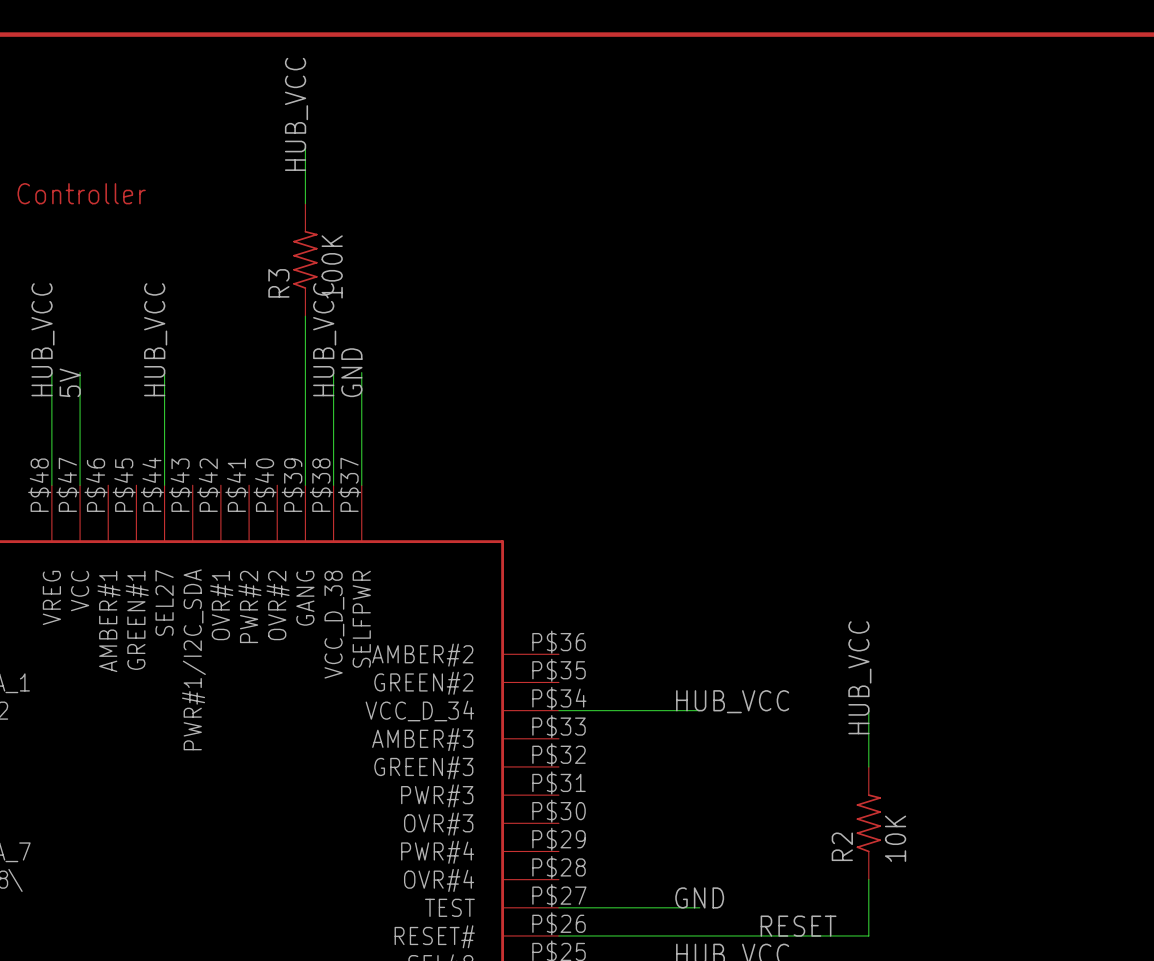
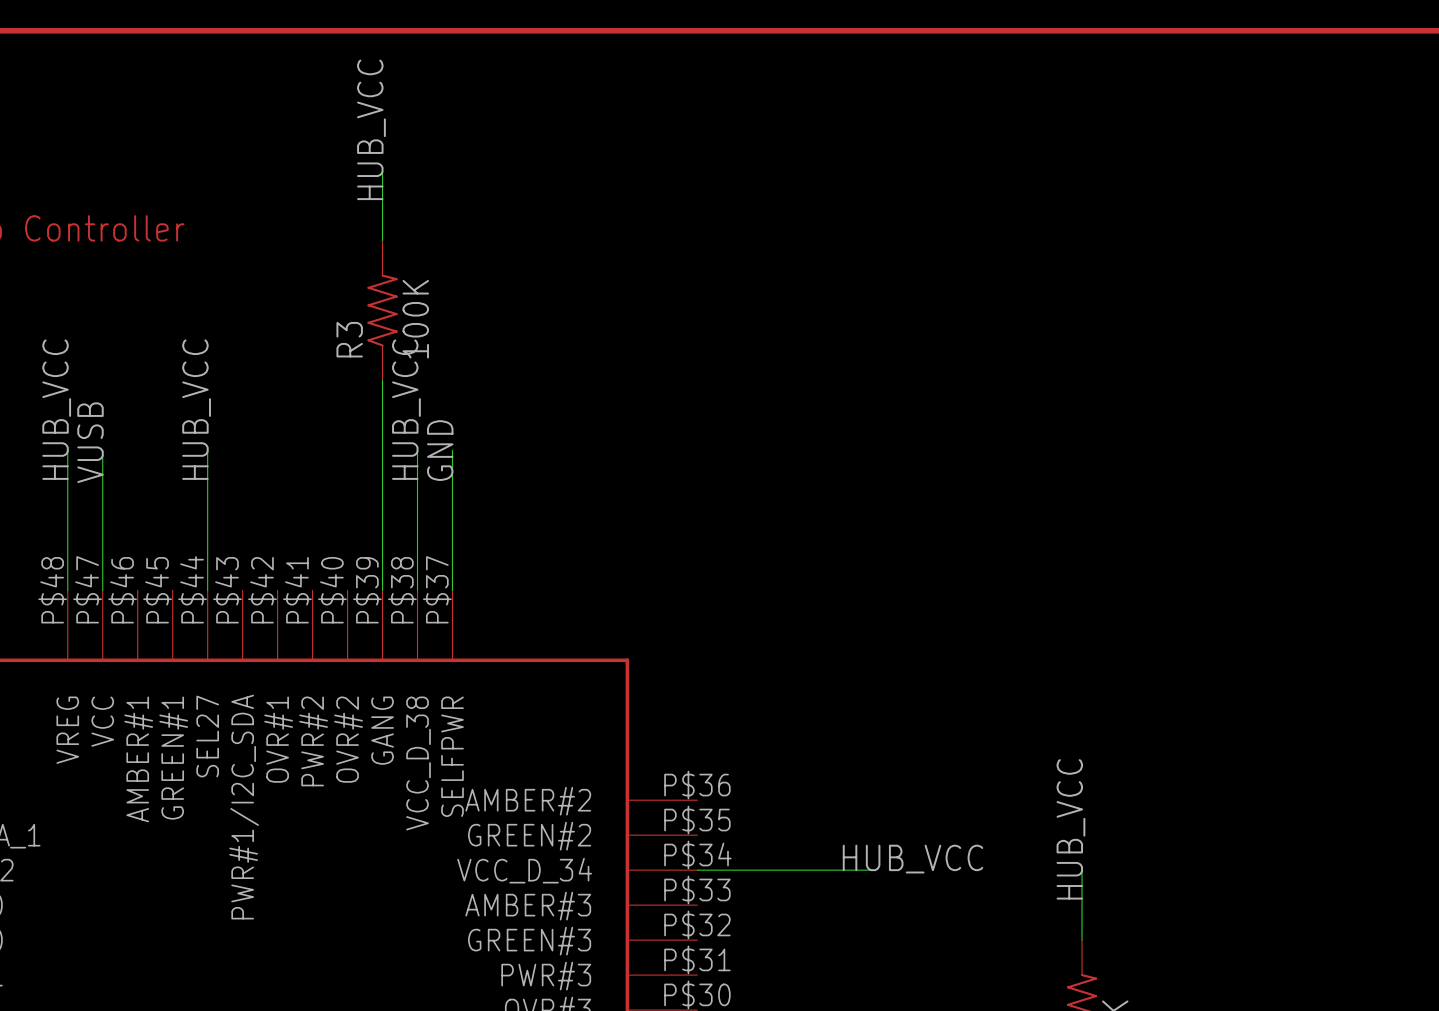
label: 5V (70, 382) -> VUSB (90, 442)

